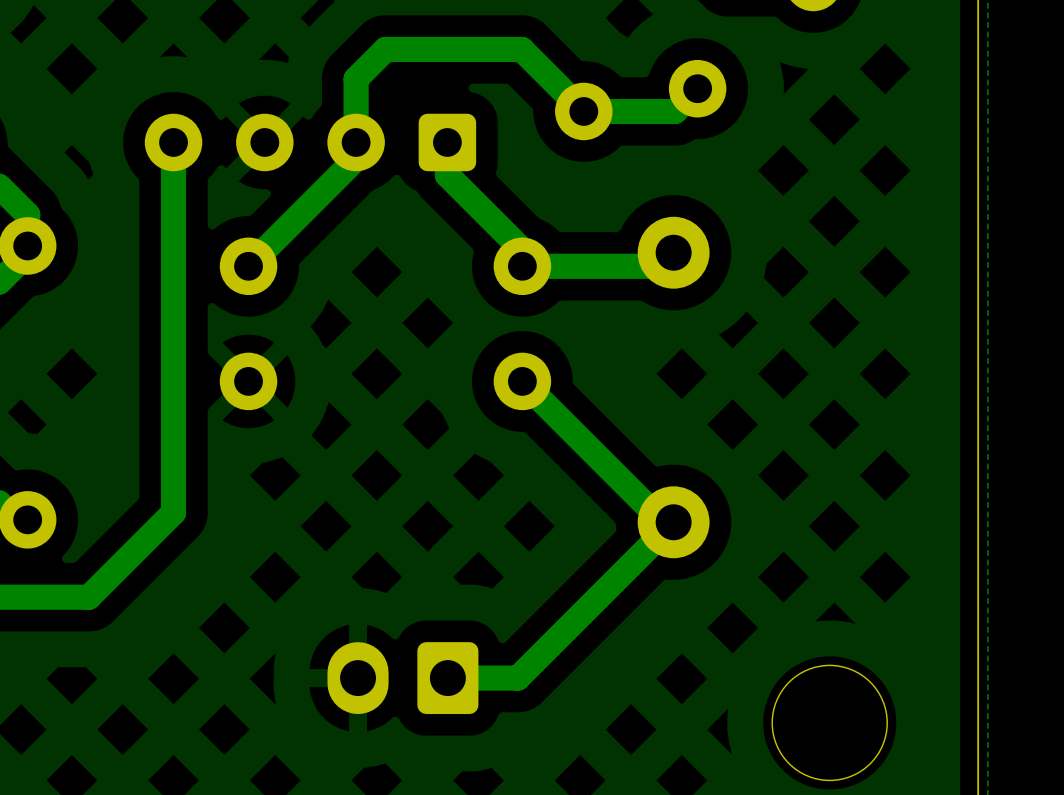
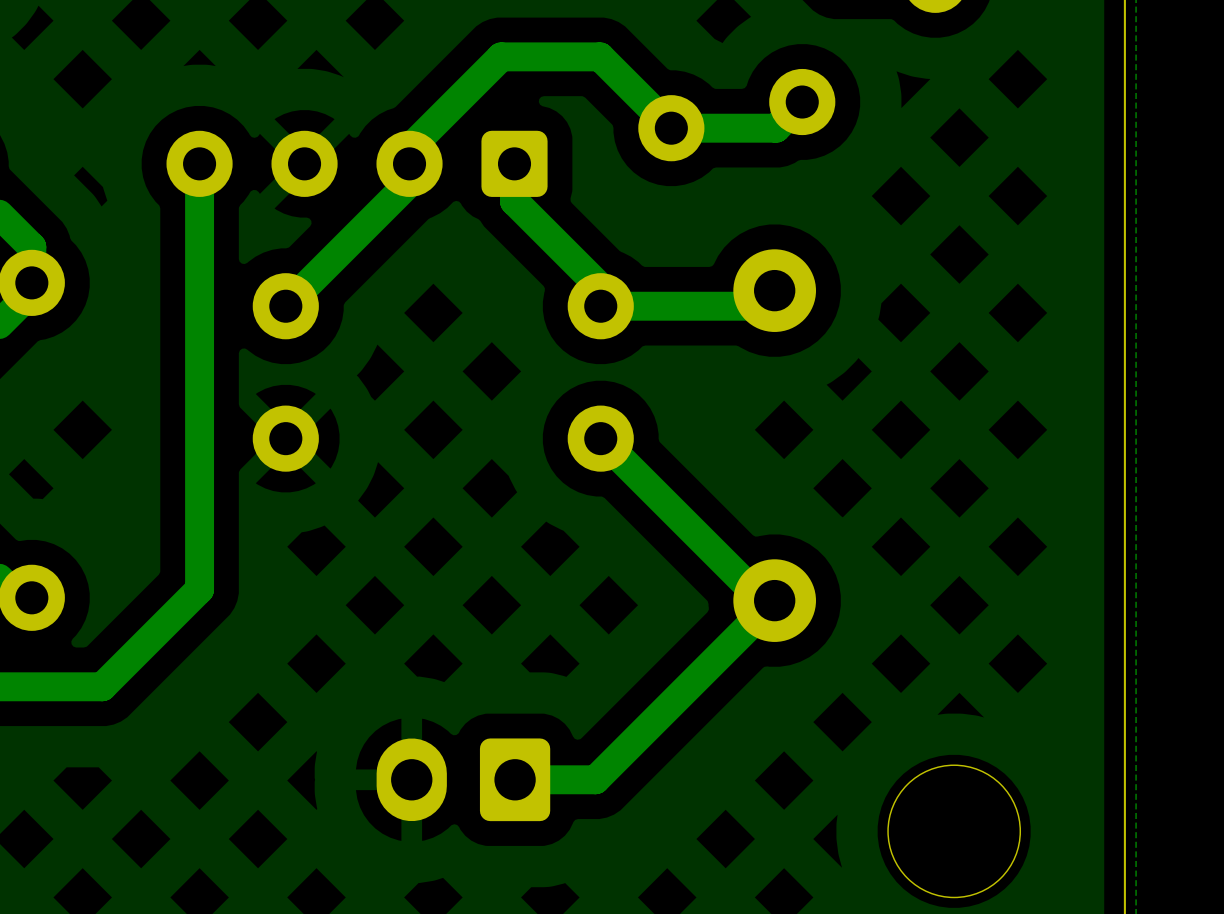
bottom track: (435, 49) (385, 49) (356, 78) (356, 129) -> (501, 56) (409, 148)

